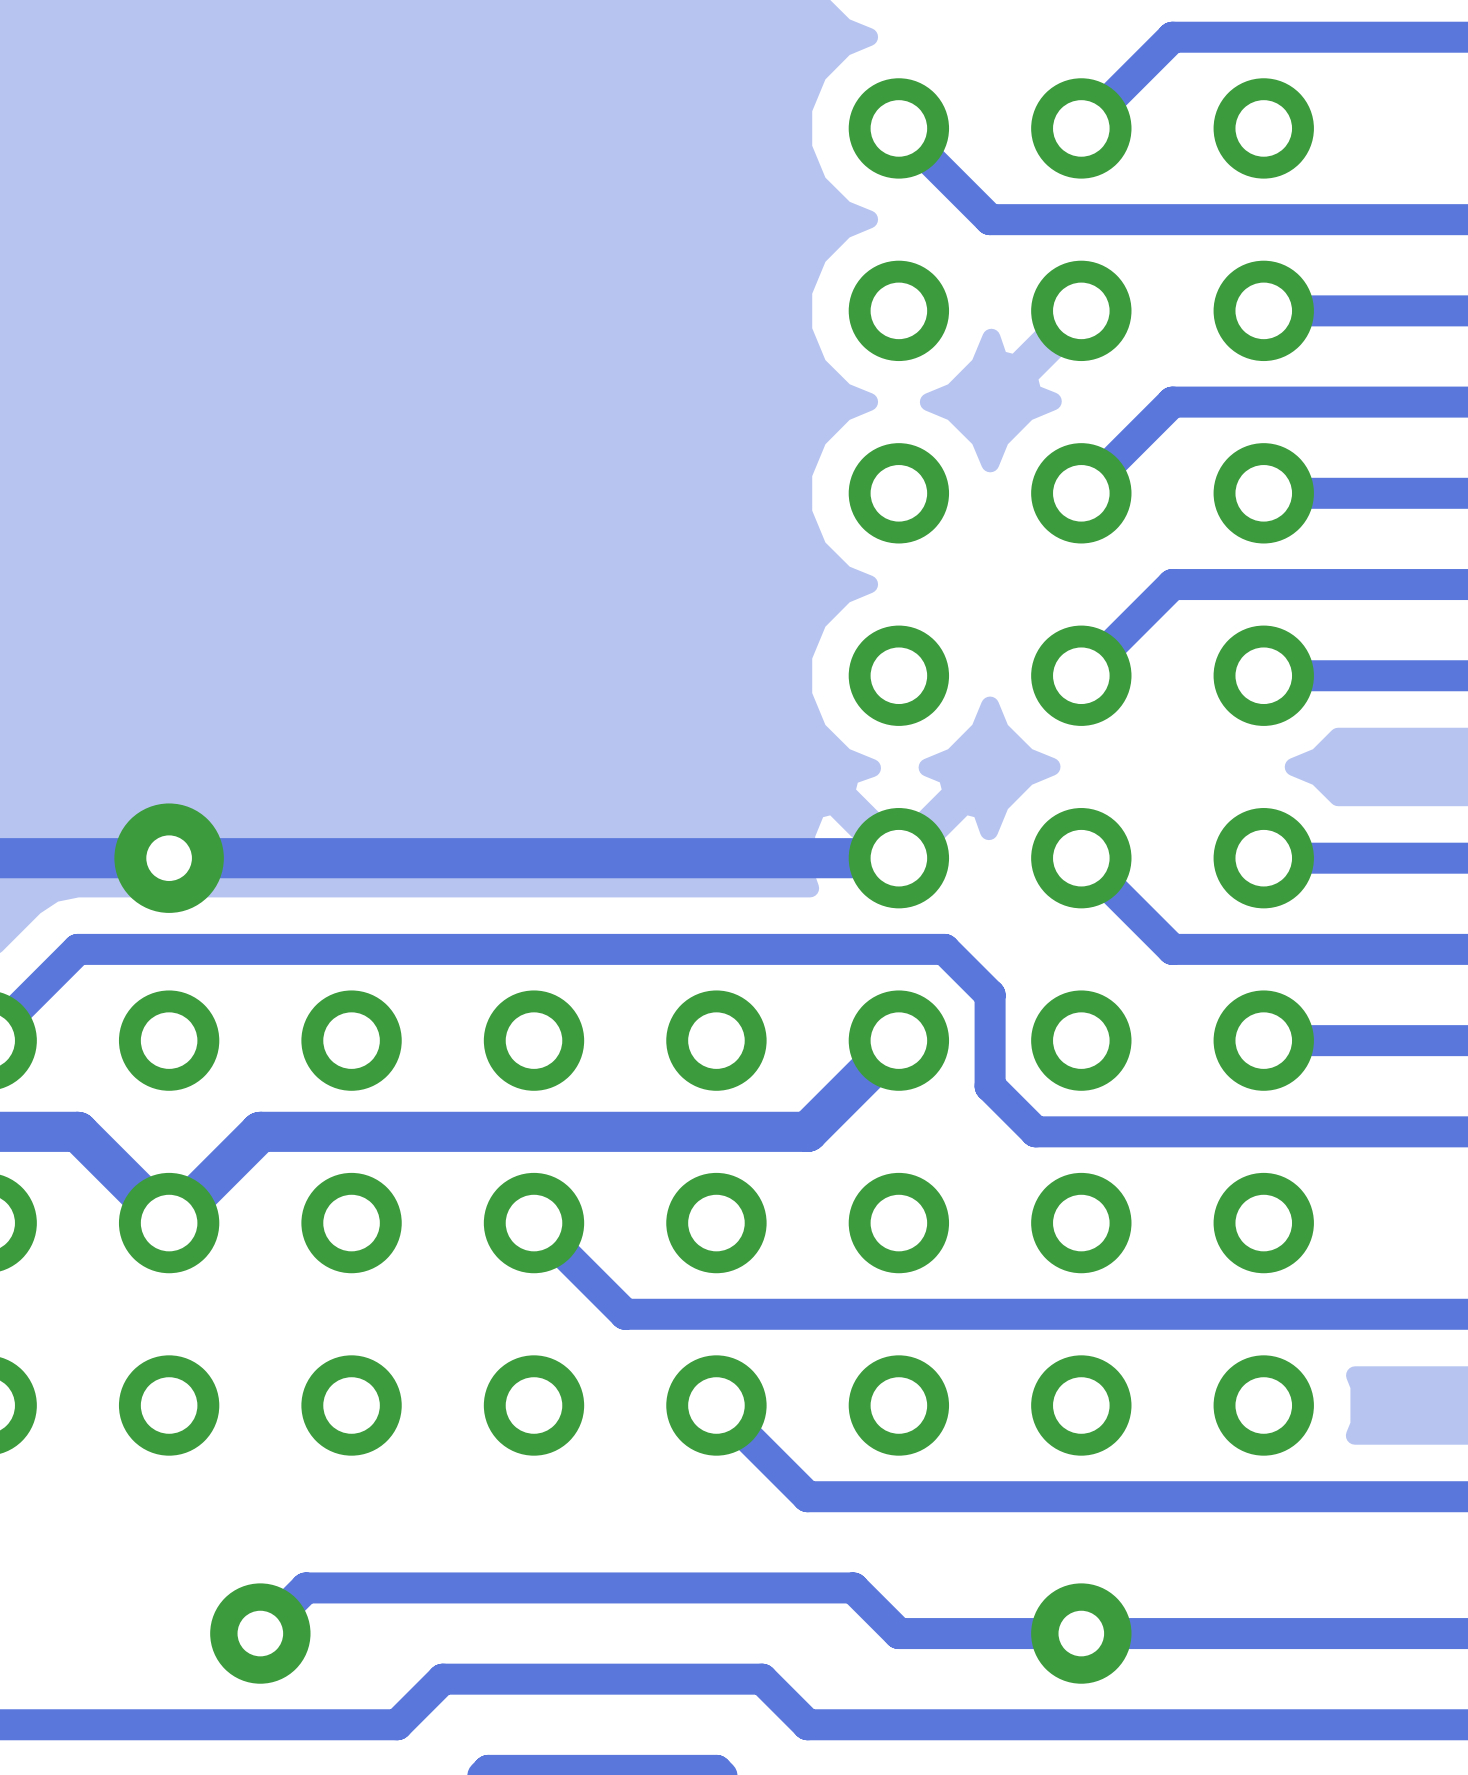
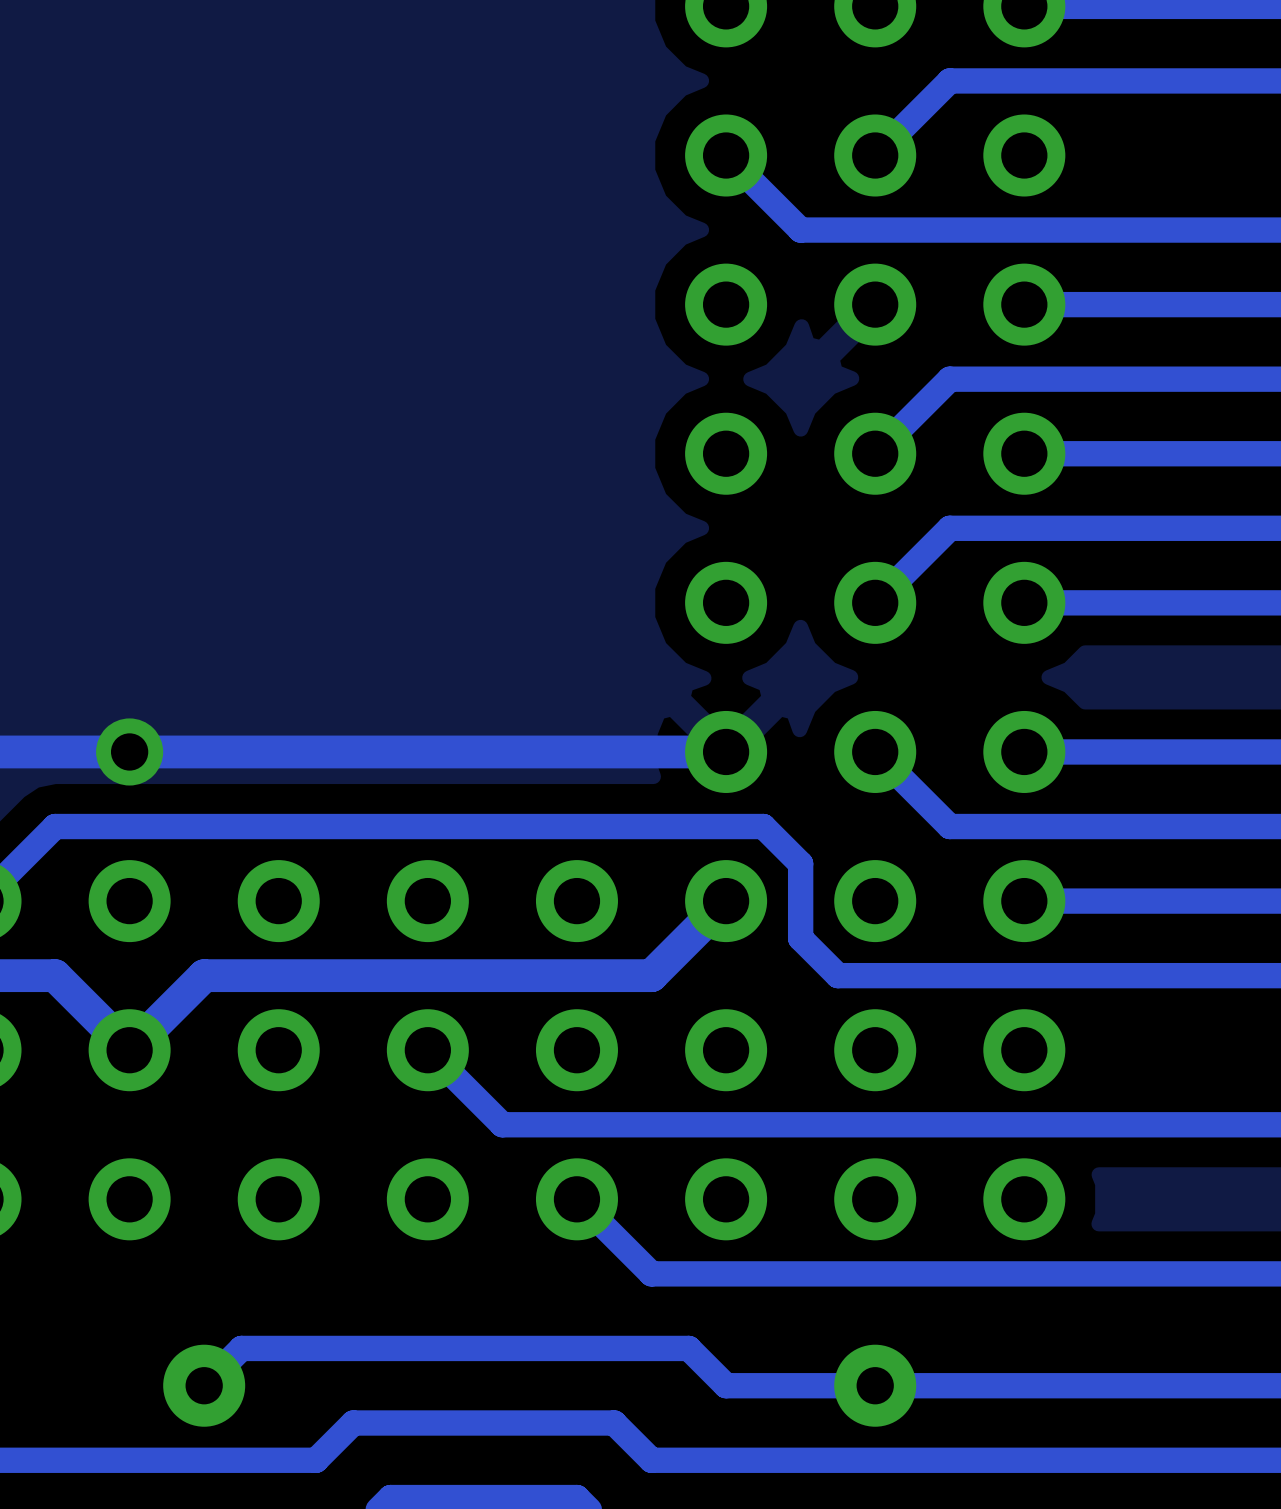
via size: [114, 803, 224, 913] -> [96, 718, 164, 786]

